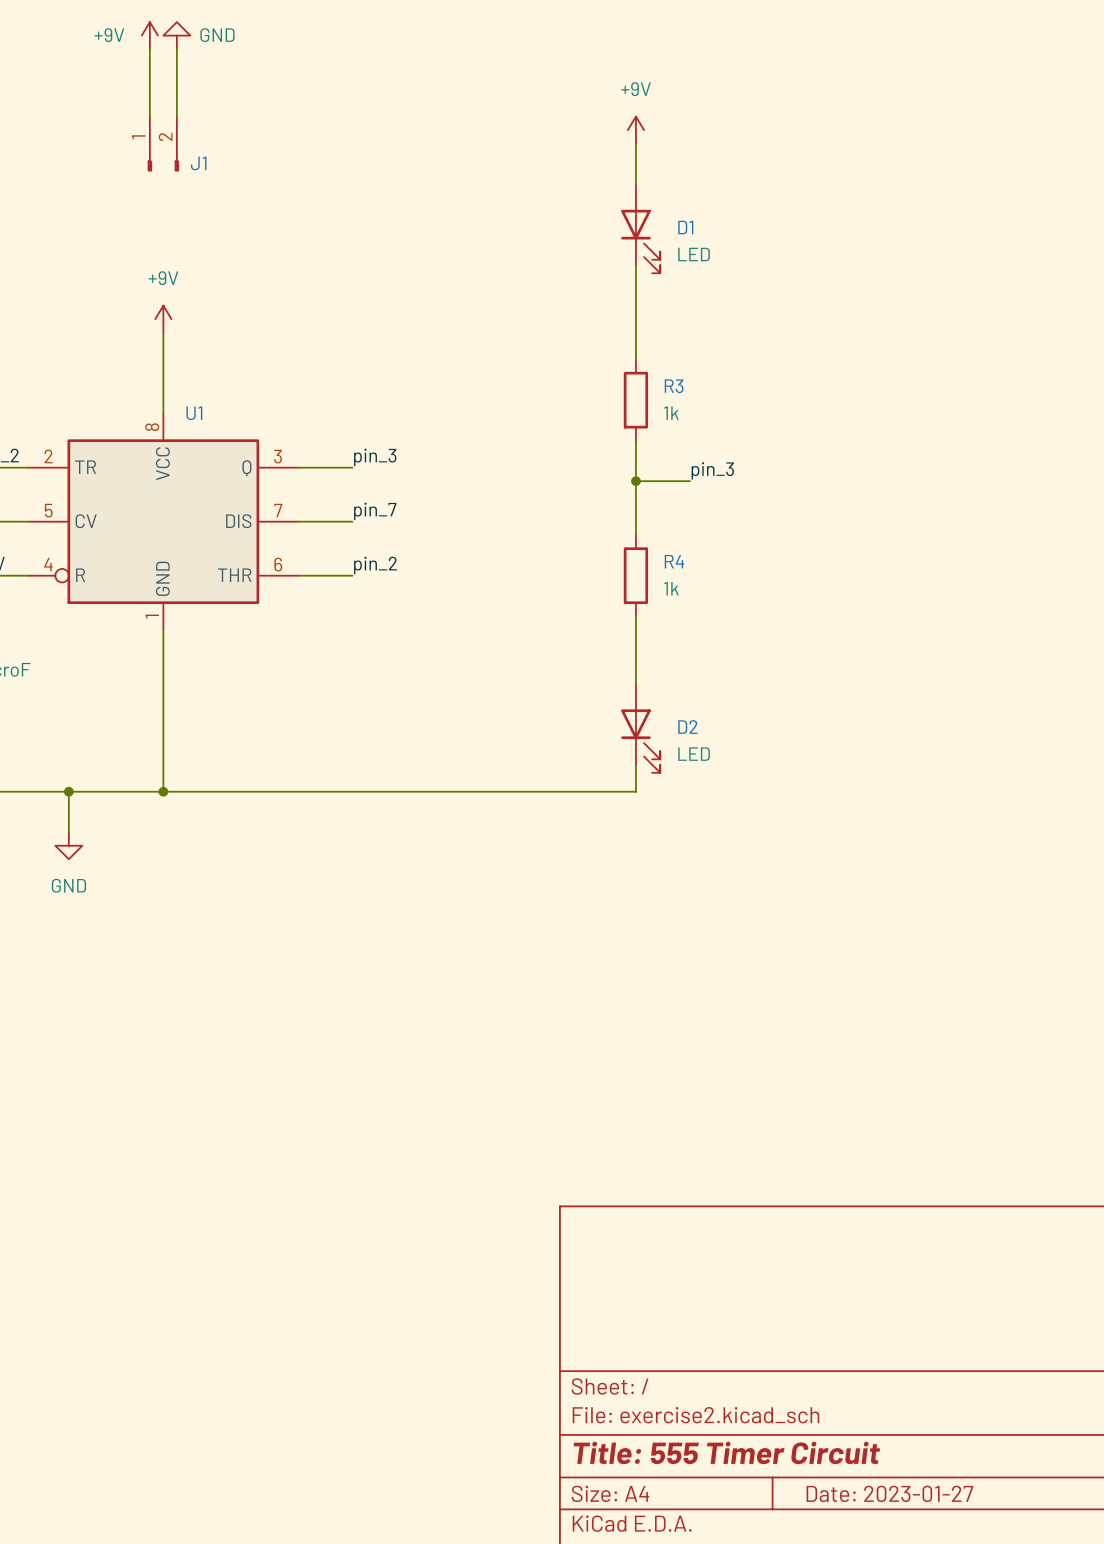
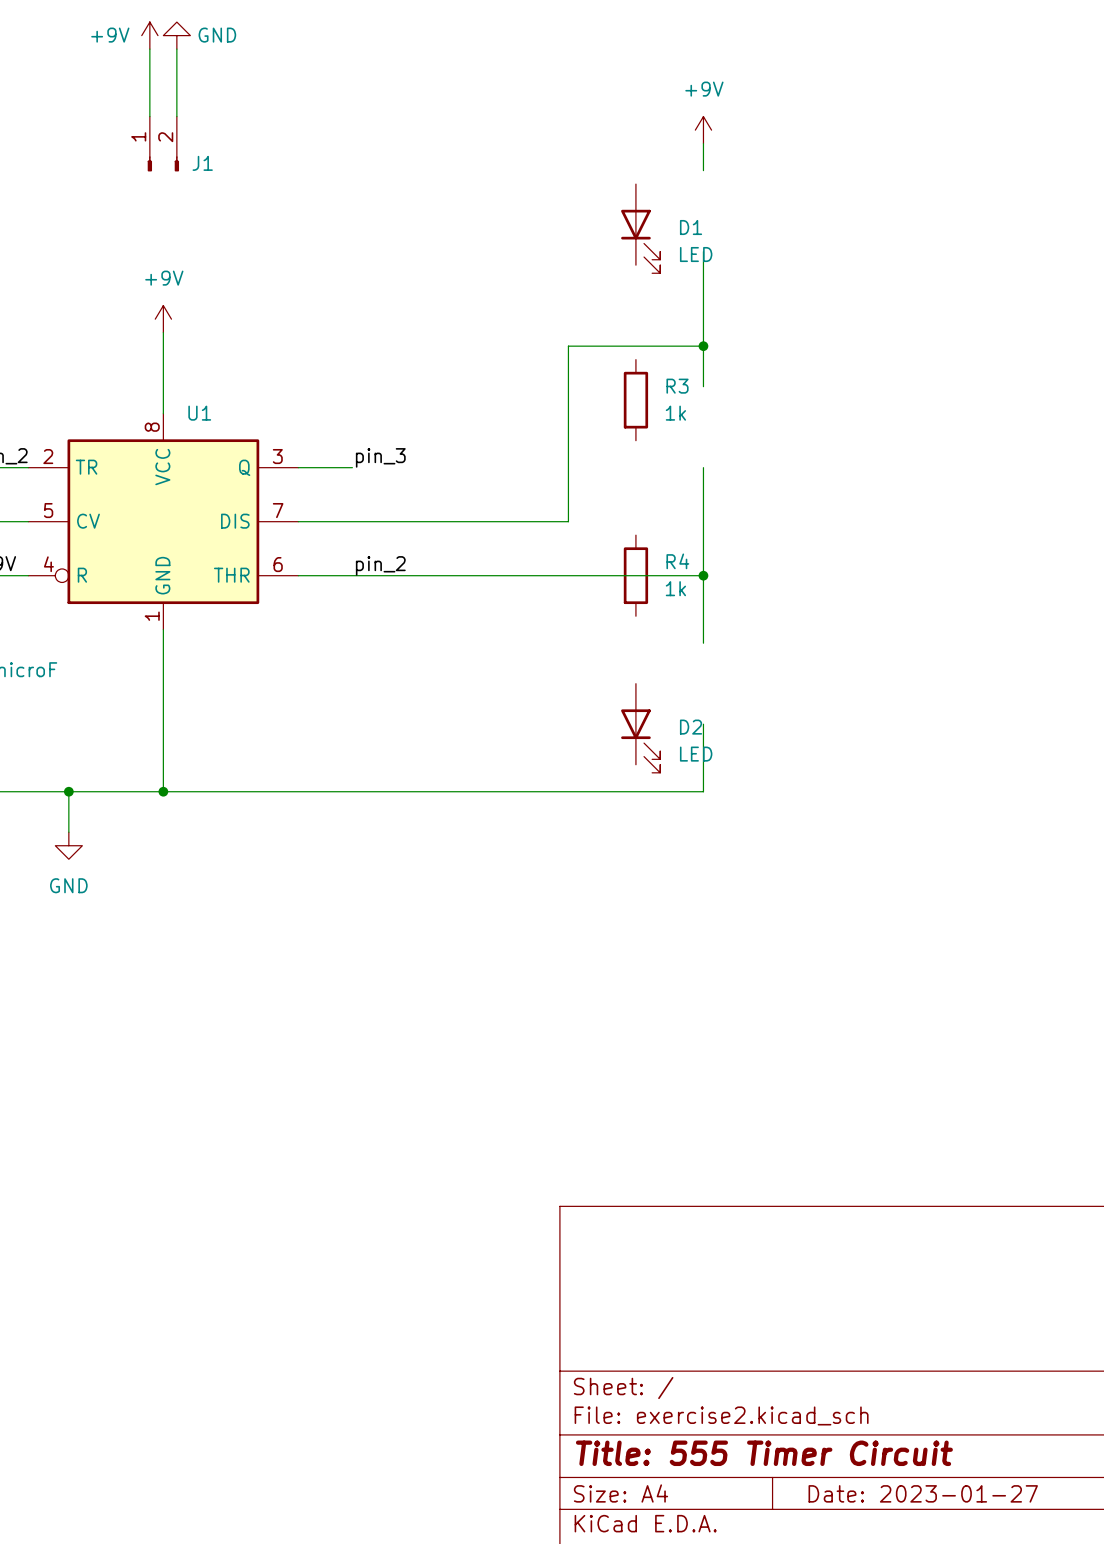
power symbol position: +9V (635, 130) -> +9V (703, 130)
wire: (635, 143) (635, 184) -> none
wire: none -> (703, 143) (703, 170)
wire: none -> (703, 251) (703, 386)
wire: (635, 265) (635, 359) -> none
wire: none -> (703, 346) (568, 346) (568, 521) (352, 521)
junction: none -> (703, 346)
wire: (635, 440) (635, 535) -> none
wire: none -> (703, 467) (703, 643)
label: pin_3 (712, 470) -> none
wire: (635, 481) (689, 481) -> none
junction: (635, 481) -> none
label: pin_7 (375, 511) -> none
wire: none -> (352, 575) (703, 575)
junction: none -> (703, 575)
wire: (635, 616) (635, 683) -> none
wire: (635, 764) (635, 791) -> (703, 724) (703, 791) (635, 791)

